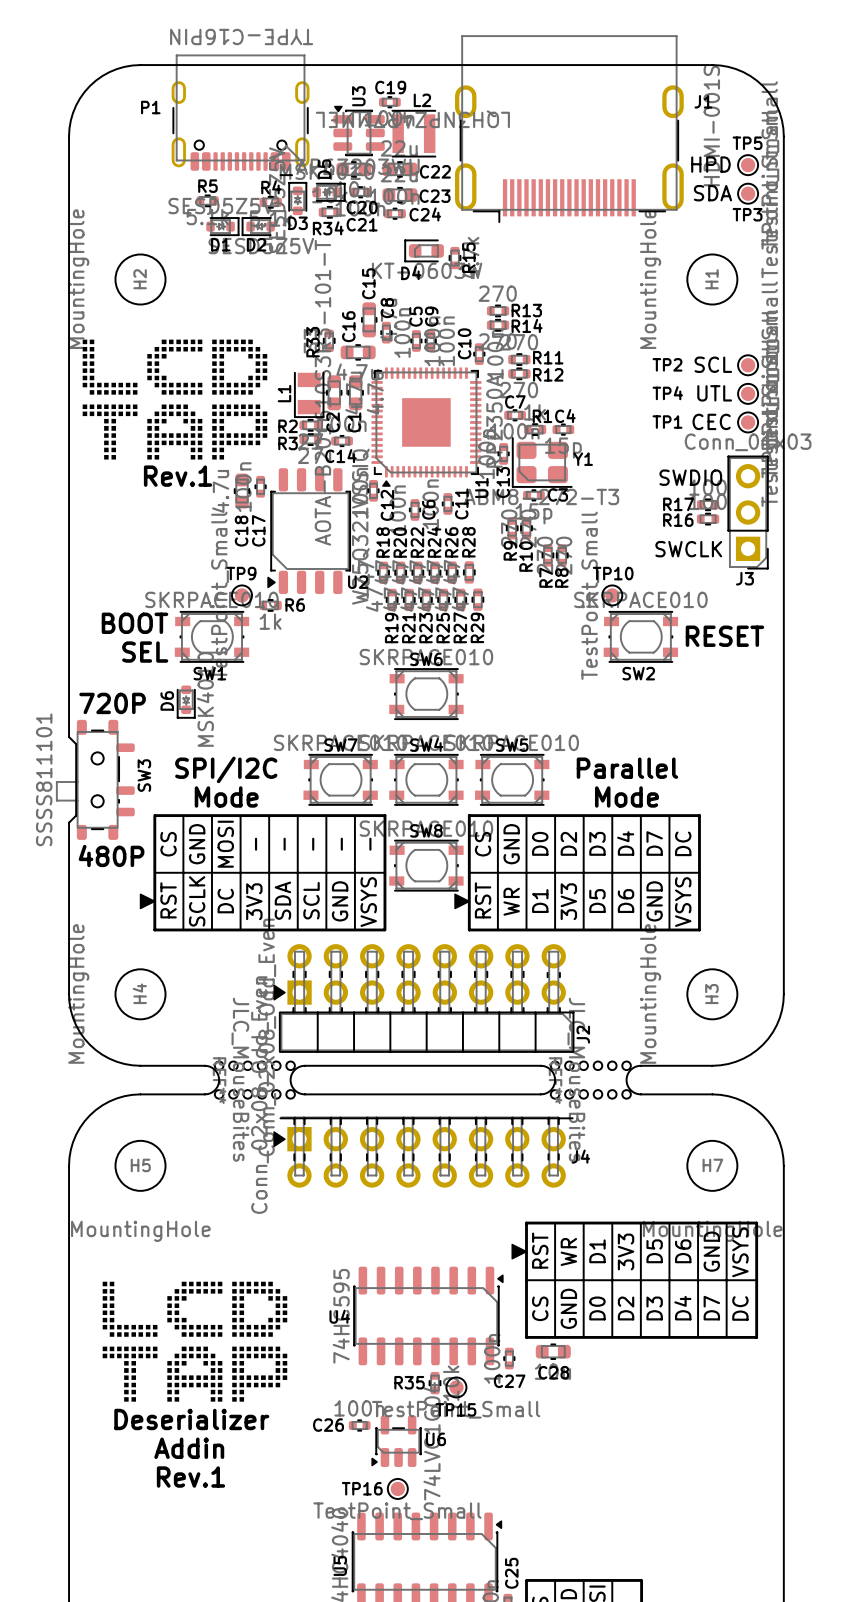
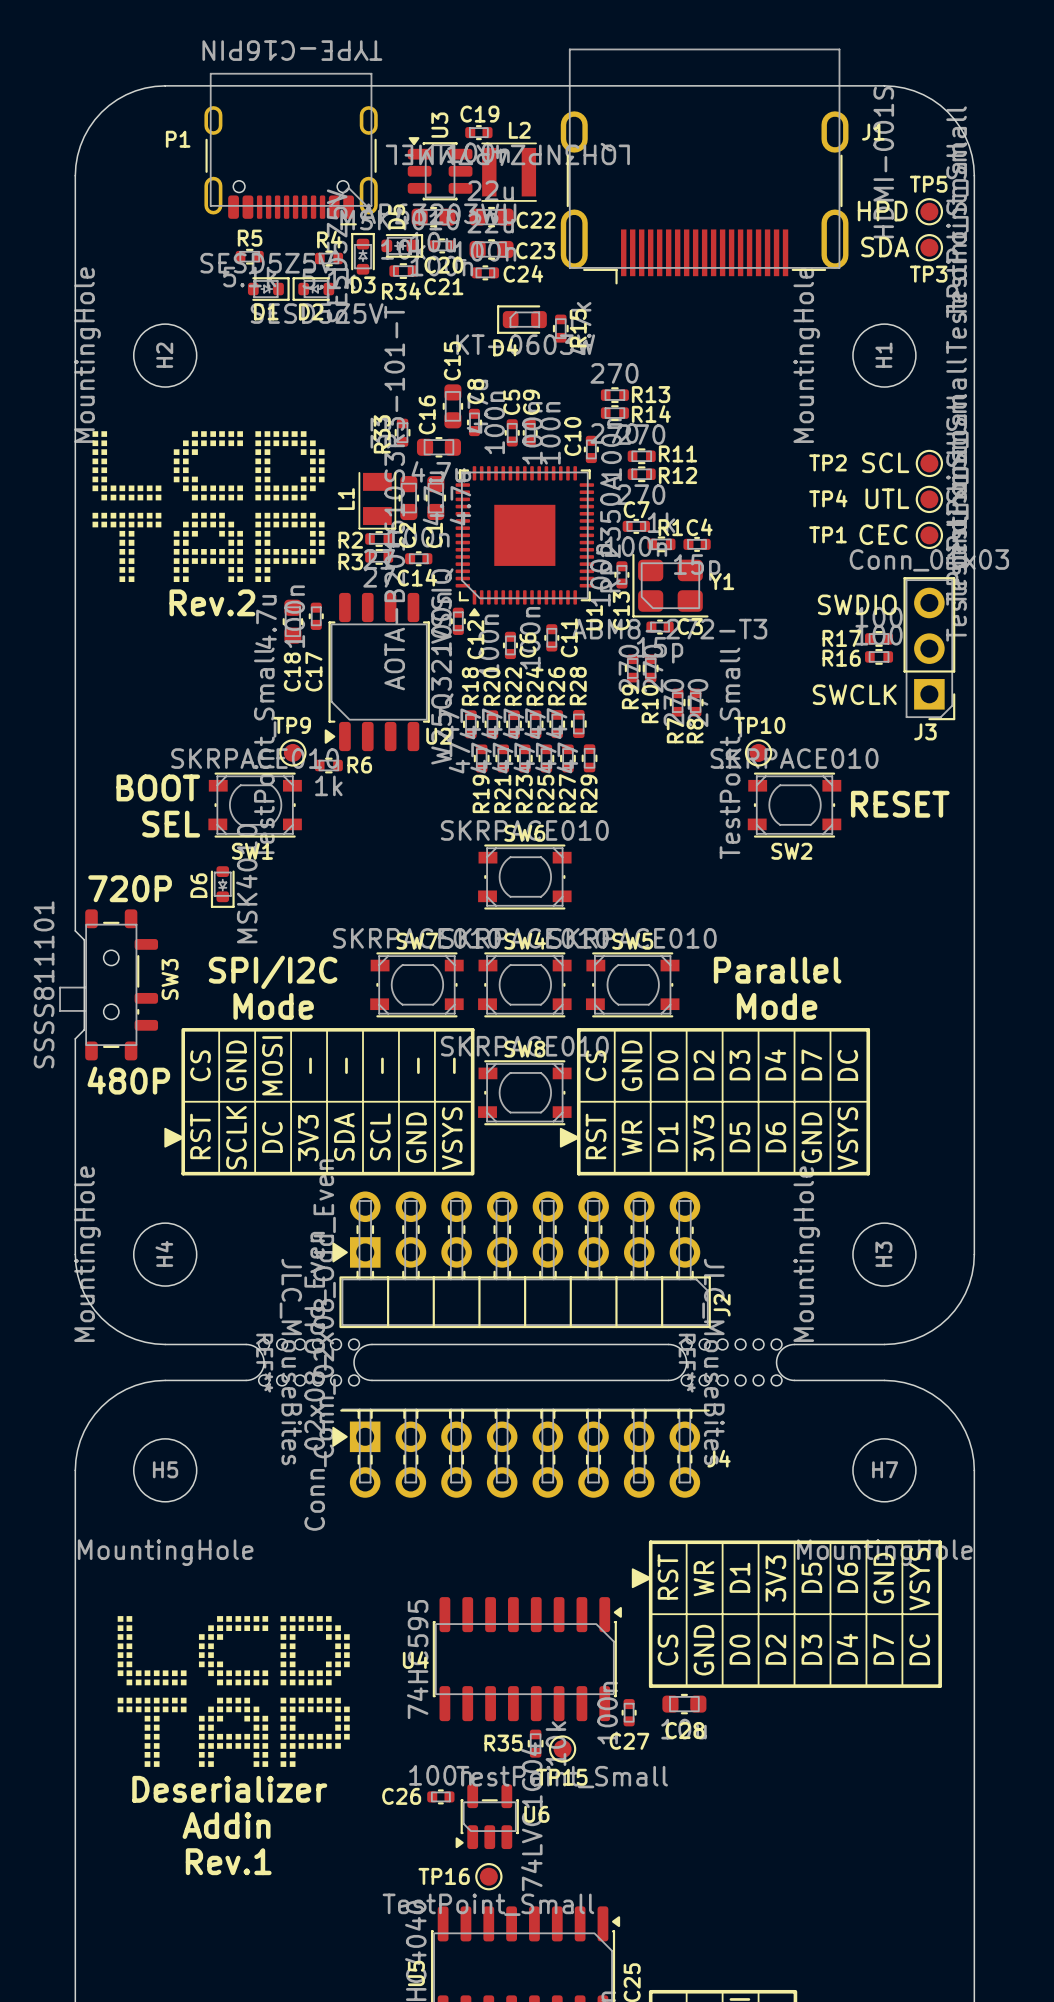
text: Rev.1 (178, 476) -> Rev.2 (212, 602)

